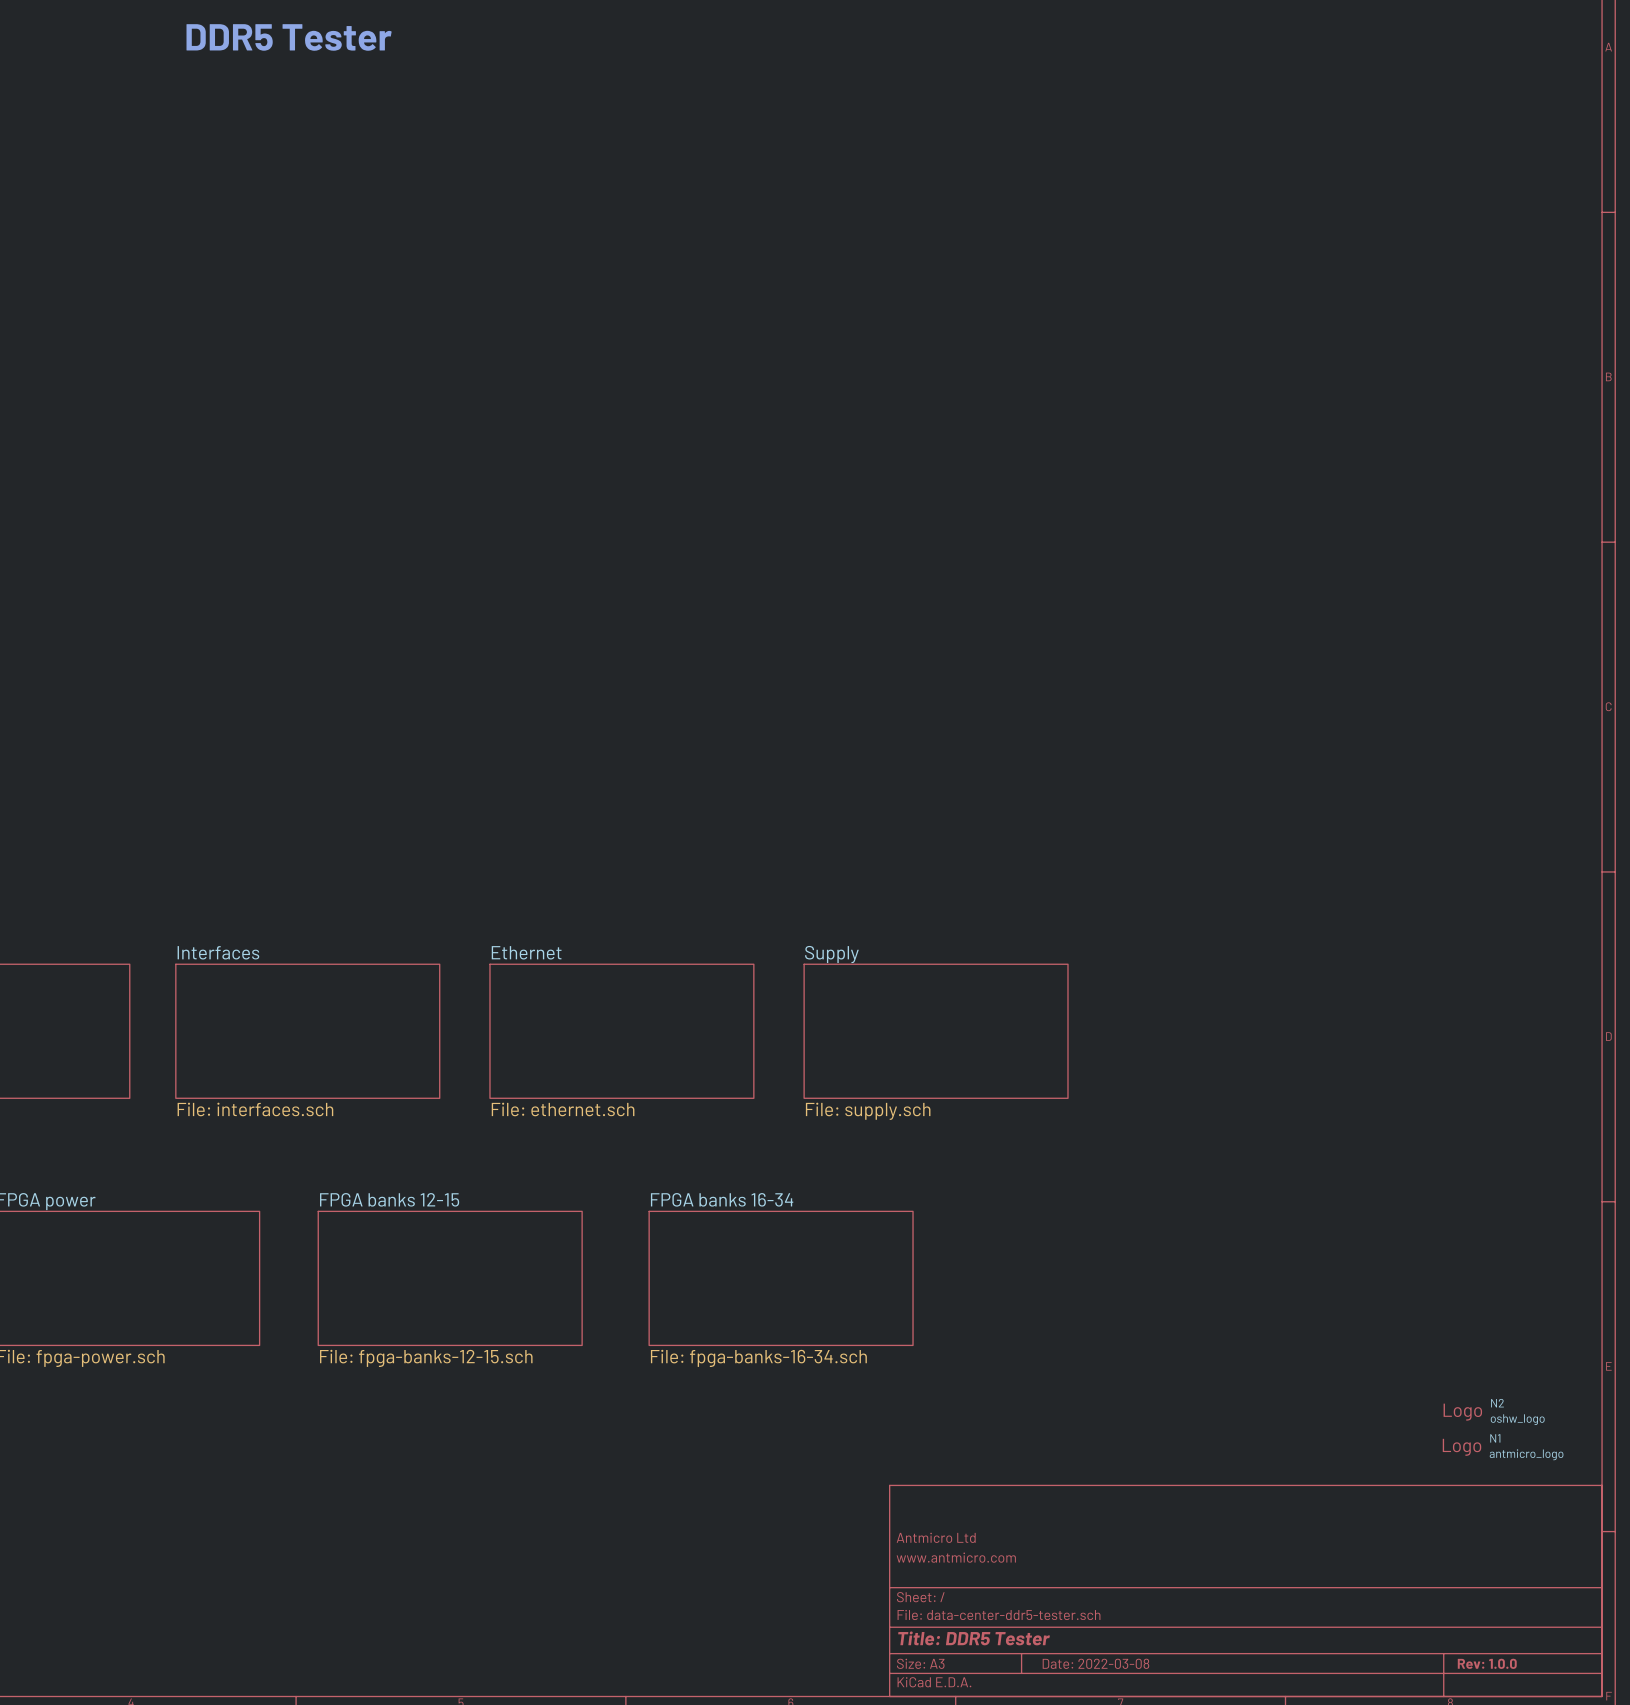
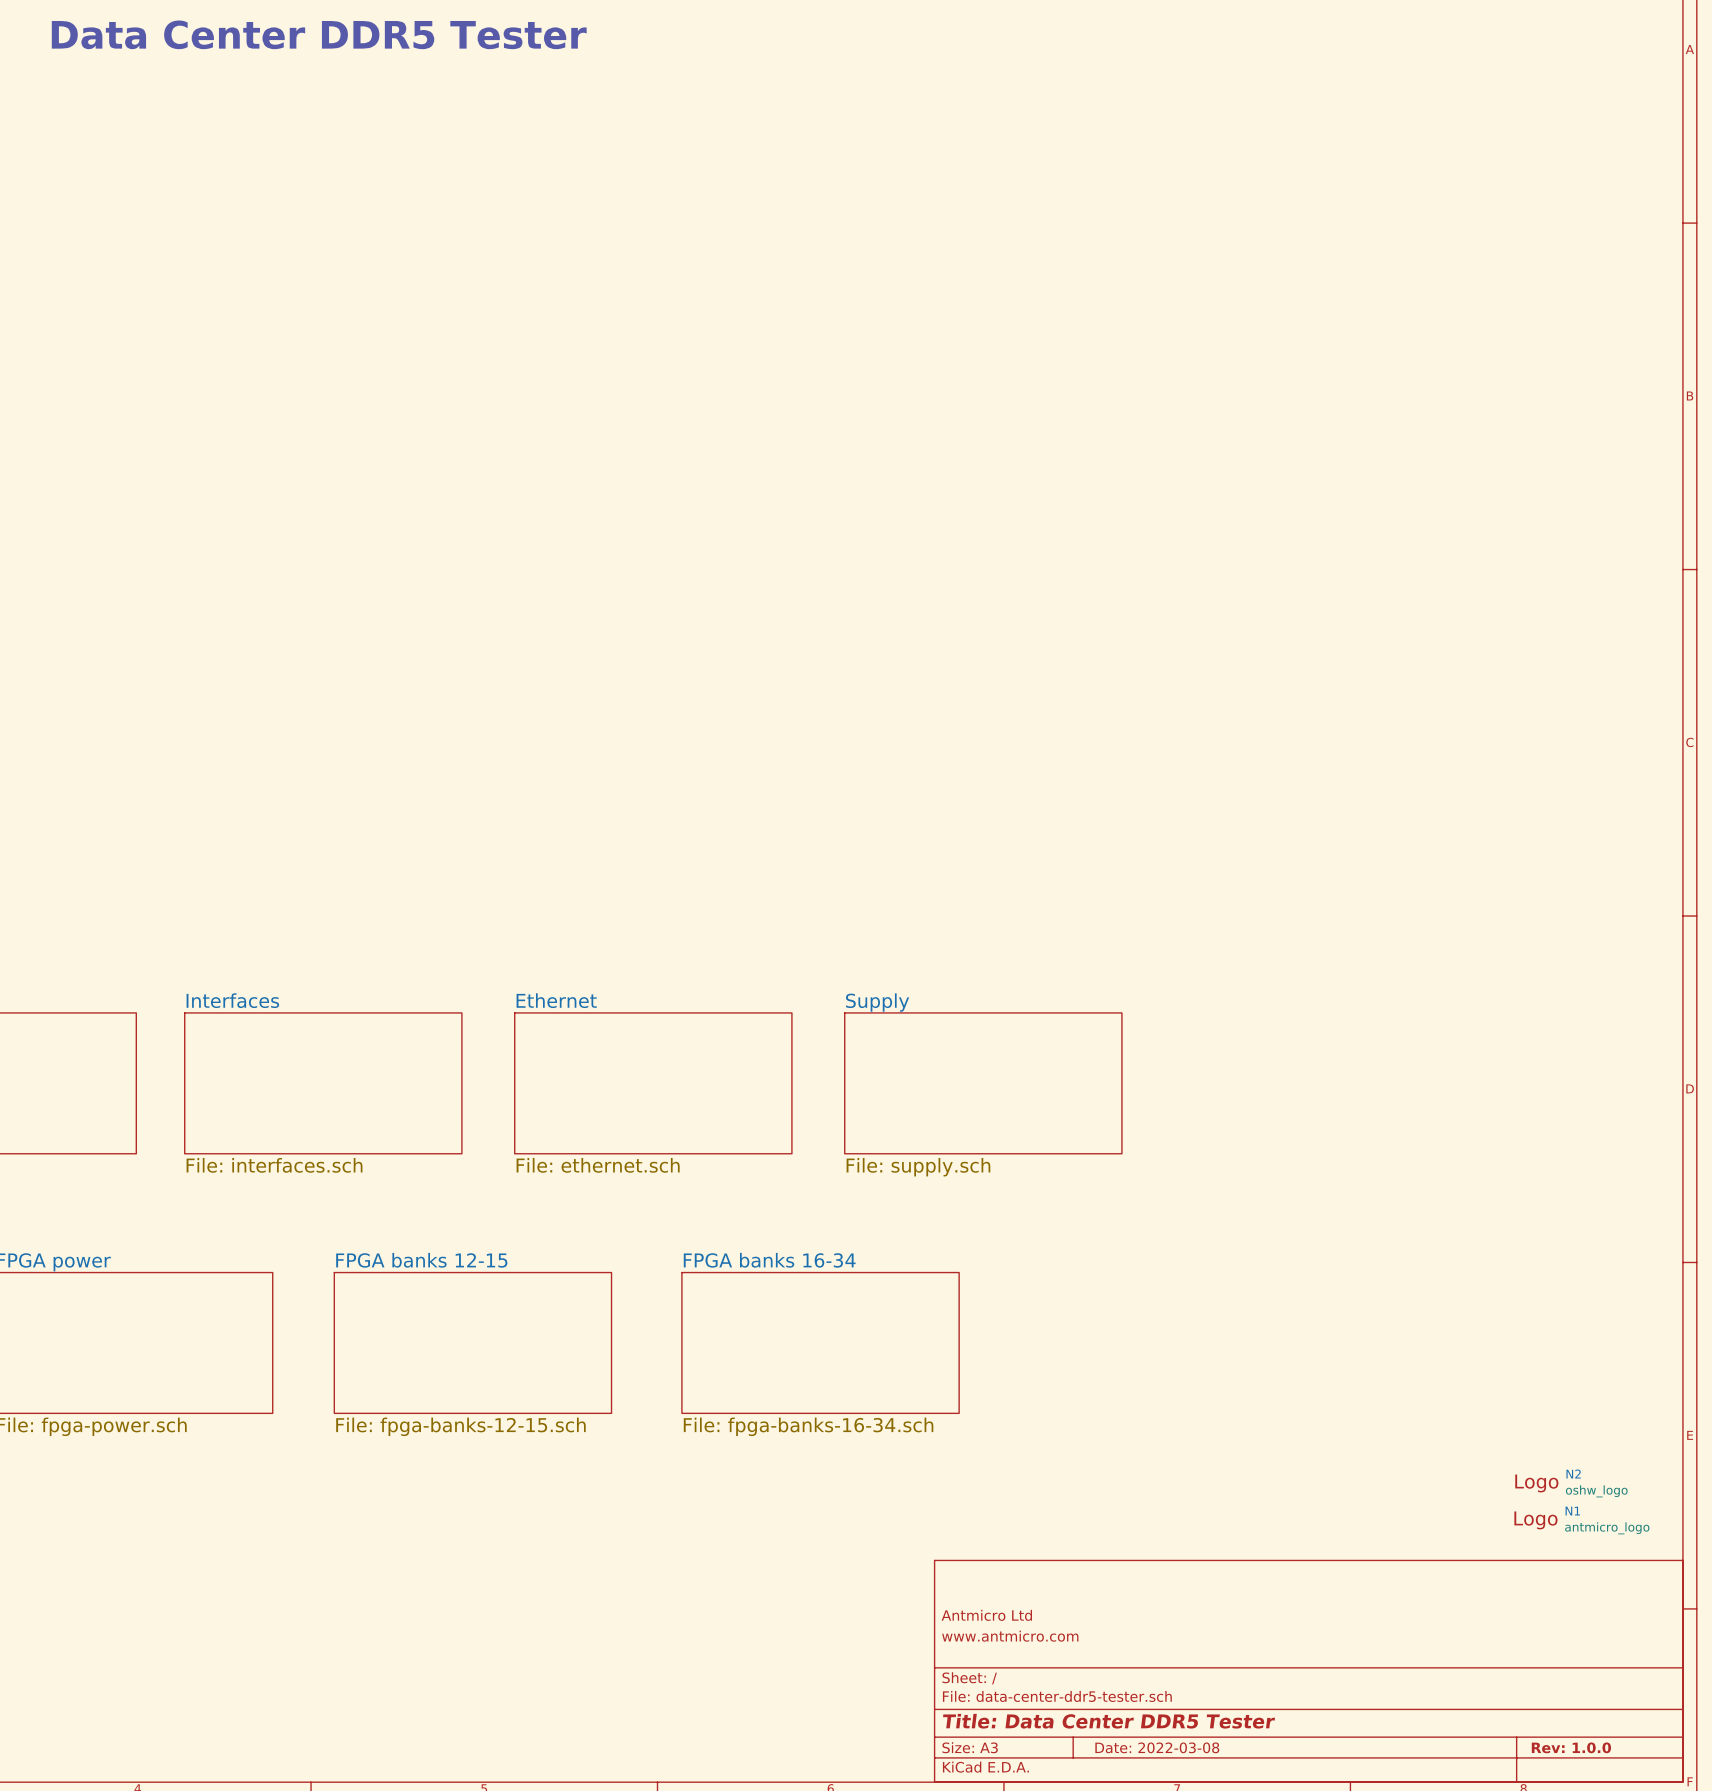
text: DDR5 Tester (289, 37) -> Data Center DDR5 Tester (319, 34)
title block: Title: DDR5 Tester (974, 1638) -> Title: Data Center DDR5 Tester (1109, 1721)

